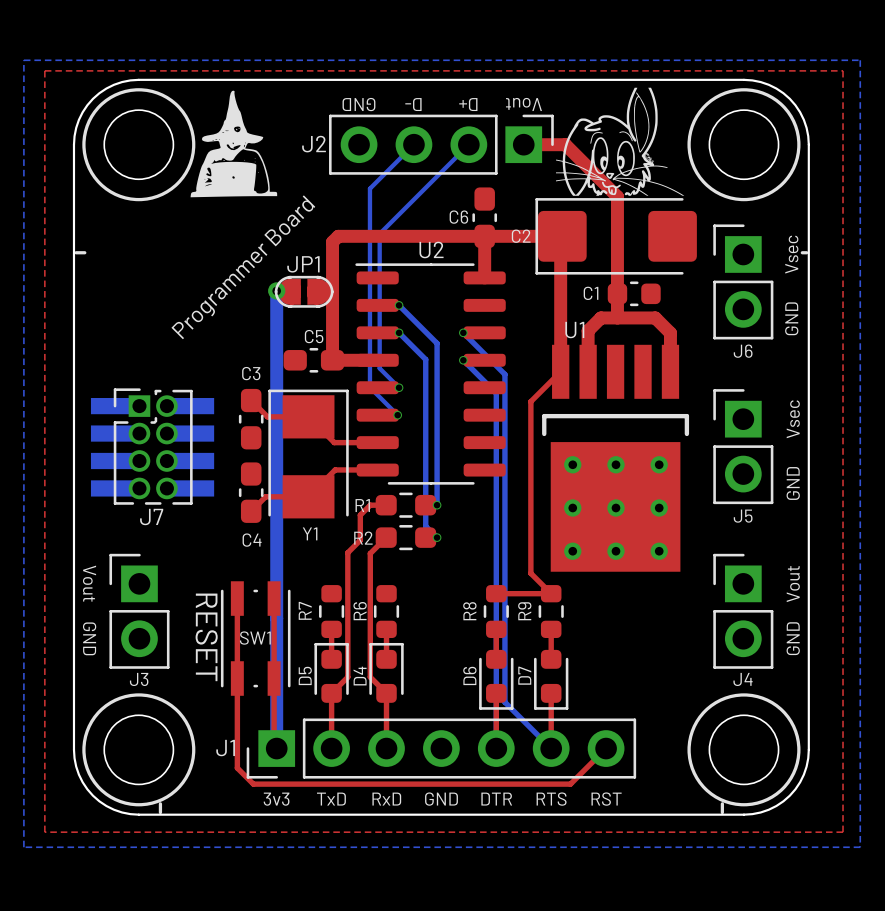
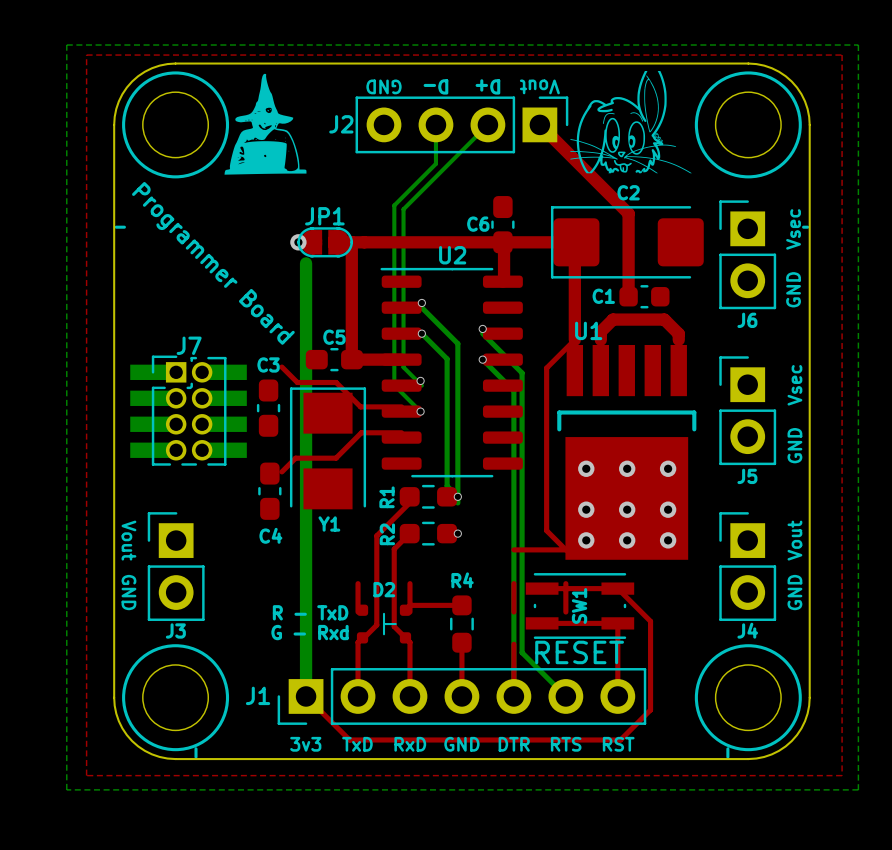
bottom track: (413, 144) (369, 188) (369, 229) -> (435, 124) (435, 163) (394, 205)
top track: (523, 144) (565, 144) (617, 196) (617, 238) -> (539, 124) (628, 213)
C6 position: (484, 217) -> (502, 224)
top track: (484, 236) (484, 277) -> none
C2 name position: C2 (521, 236) -> C2 (628, 192)
C2 position: (616, 236) -> (627, 242)
text rotation: 0° (243, 267) -> 90° clockwise (213, 263)
top track: none -> (338, 242) (502, 242)
top track: none -> (351, 242) (351, 359) (401, 359)
top track: (560, 270) (560, 238) (562, 236) (338, 236) (332, 242) (332, 360) (377, 360) -> (574, 243) (576, 242) (504, 242) (502, 281)
via position: (276, 290) -> (298, 242)
JP1 position: (304, 291) -> (325, 242)
C1 position: (634, 293) -> (644, 296)
bottom track: (399, 305) (437, 343) (437, 375) -> (421, 307) (457, 343)
via: (399, 305) -> none
bottom track: (399, 332) (425, 359) (425, 391) -> (421, 333) (447, 358)
bottom track: (463, 332) (504, 374) (504, 406) -> (482, 333) (522, 373)
via: (463, 332) -> none
C5 position: (313, 360) -> (334, 359)
bottom track: (463, 360) (496, 393) (496, 425) -> (482, 359) (513, 390)
top track: (588, 363) (588, 330) (600, 317) (655, 317) (670, 333) (670, 365) -> (600, 331) (612, 319) (664, 319) (678, 333)
bottom track: (379, 368) (399, 387) -> (403, 336) (403, 367) (421, 385)
U2 position: (430, 374) -> (451, 372)
bottom track: (369, 387) (397, 415) -> (394, 354) (394, 385) (420, 411)
via position: (399, 387) -> (421, 333)
via: none -> (482, 359)
C3 position: (251, 419) -> (268, 408)
via: none -> (420, 411)
Y1 position: (308, 454) -> (328, 448)
U1 position: (615, 458) -> (626, 452)
via: (572, 464) -> none
via: (615, 464) -> none
via: (659, 464) -> none
C4 position: (251, 492) -> (269, 491)
top track: (386, 505) (370, 505) (360, 515) (360, 540) (347, 552) (347, 677) (331, 693) -> (409, 502) (376, 535) (376, 625) (358, 644)
R1: (405, 505) -> none
bottom track: none -> (457, 466) (457, 502)
via: (437, 505) -> none
J7 name position: J7 (151, 517) -> J7 (189, 345)
top track: (386, 537) (370, 553) (370, 677) (386, 693) -> (409, 533) (394, 549) (394, 626) (409, 644)
R2 name: R2 (363, 538) -> R1 (387, 497)
R2: none -> (428, 533)
via: none -> (457, 533)
via: none -> (586, 540)
via: none -> (627, 540)
via: none -> (668, 540)
top track: (237, 598) (237, 768) (253, 784) (570, 784) (606, 748) -> (542, 623) (617, 623) (617, 696)
top track: (274, 598) (274, 745) (276, 748) -> (542, 588) (617, 588) (650, 621) (650, 709) (620, 739) (349, 739) (306, 696)
R7: (331, 611) -> none
R6: (386, 611) -> none
R8: (496, 611) -> none
R9: (551, 611) -> none
text rotation: 0° (206, 637) -> 90° counterclockwise (579, 652)
text position: RESET (206, 637) -> RESET (579, 652)
SW1 rotation: 0° (255, 638) -> 90° clockwise (579, 606)
SW1 position: (255, 638) -> (579, 606)
top track: none -> (461, 605) (410, 605) (405, 610)
text: none -> R - TxD (310, 612)
D5: (331, 672) -> none
D2: none -> (384, 624)
D4: (386, 672) -> none
R4: none -> (461, 624)
D6: (496, 679) -> none
D7: (551, 679) -> none
text: none -> G - Rxd (310, 632)
top track: none -> (461, 642) (461, 696)
top track: (551, 693) (551, 748) -> none

